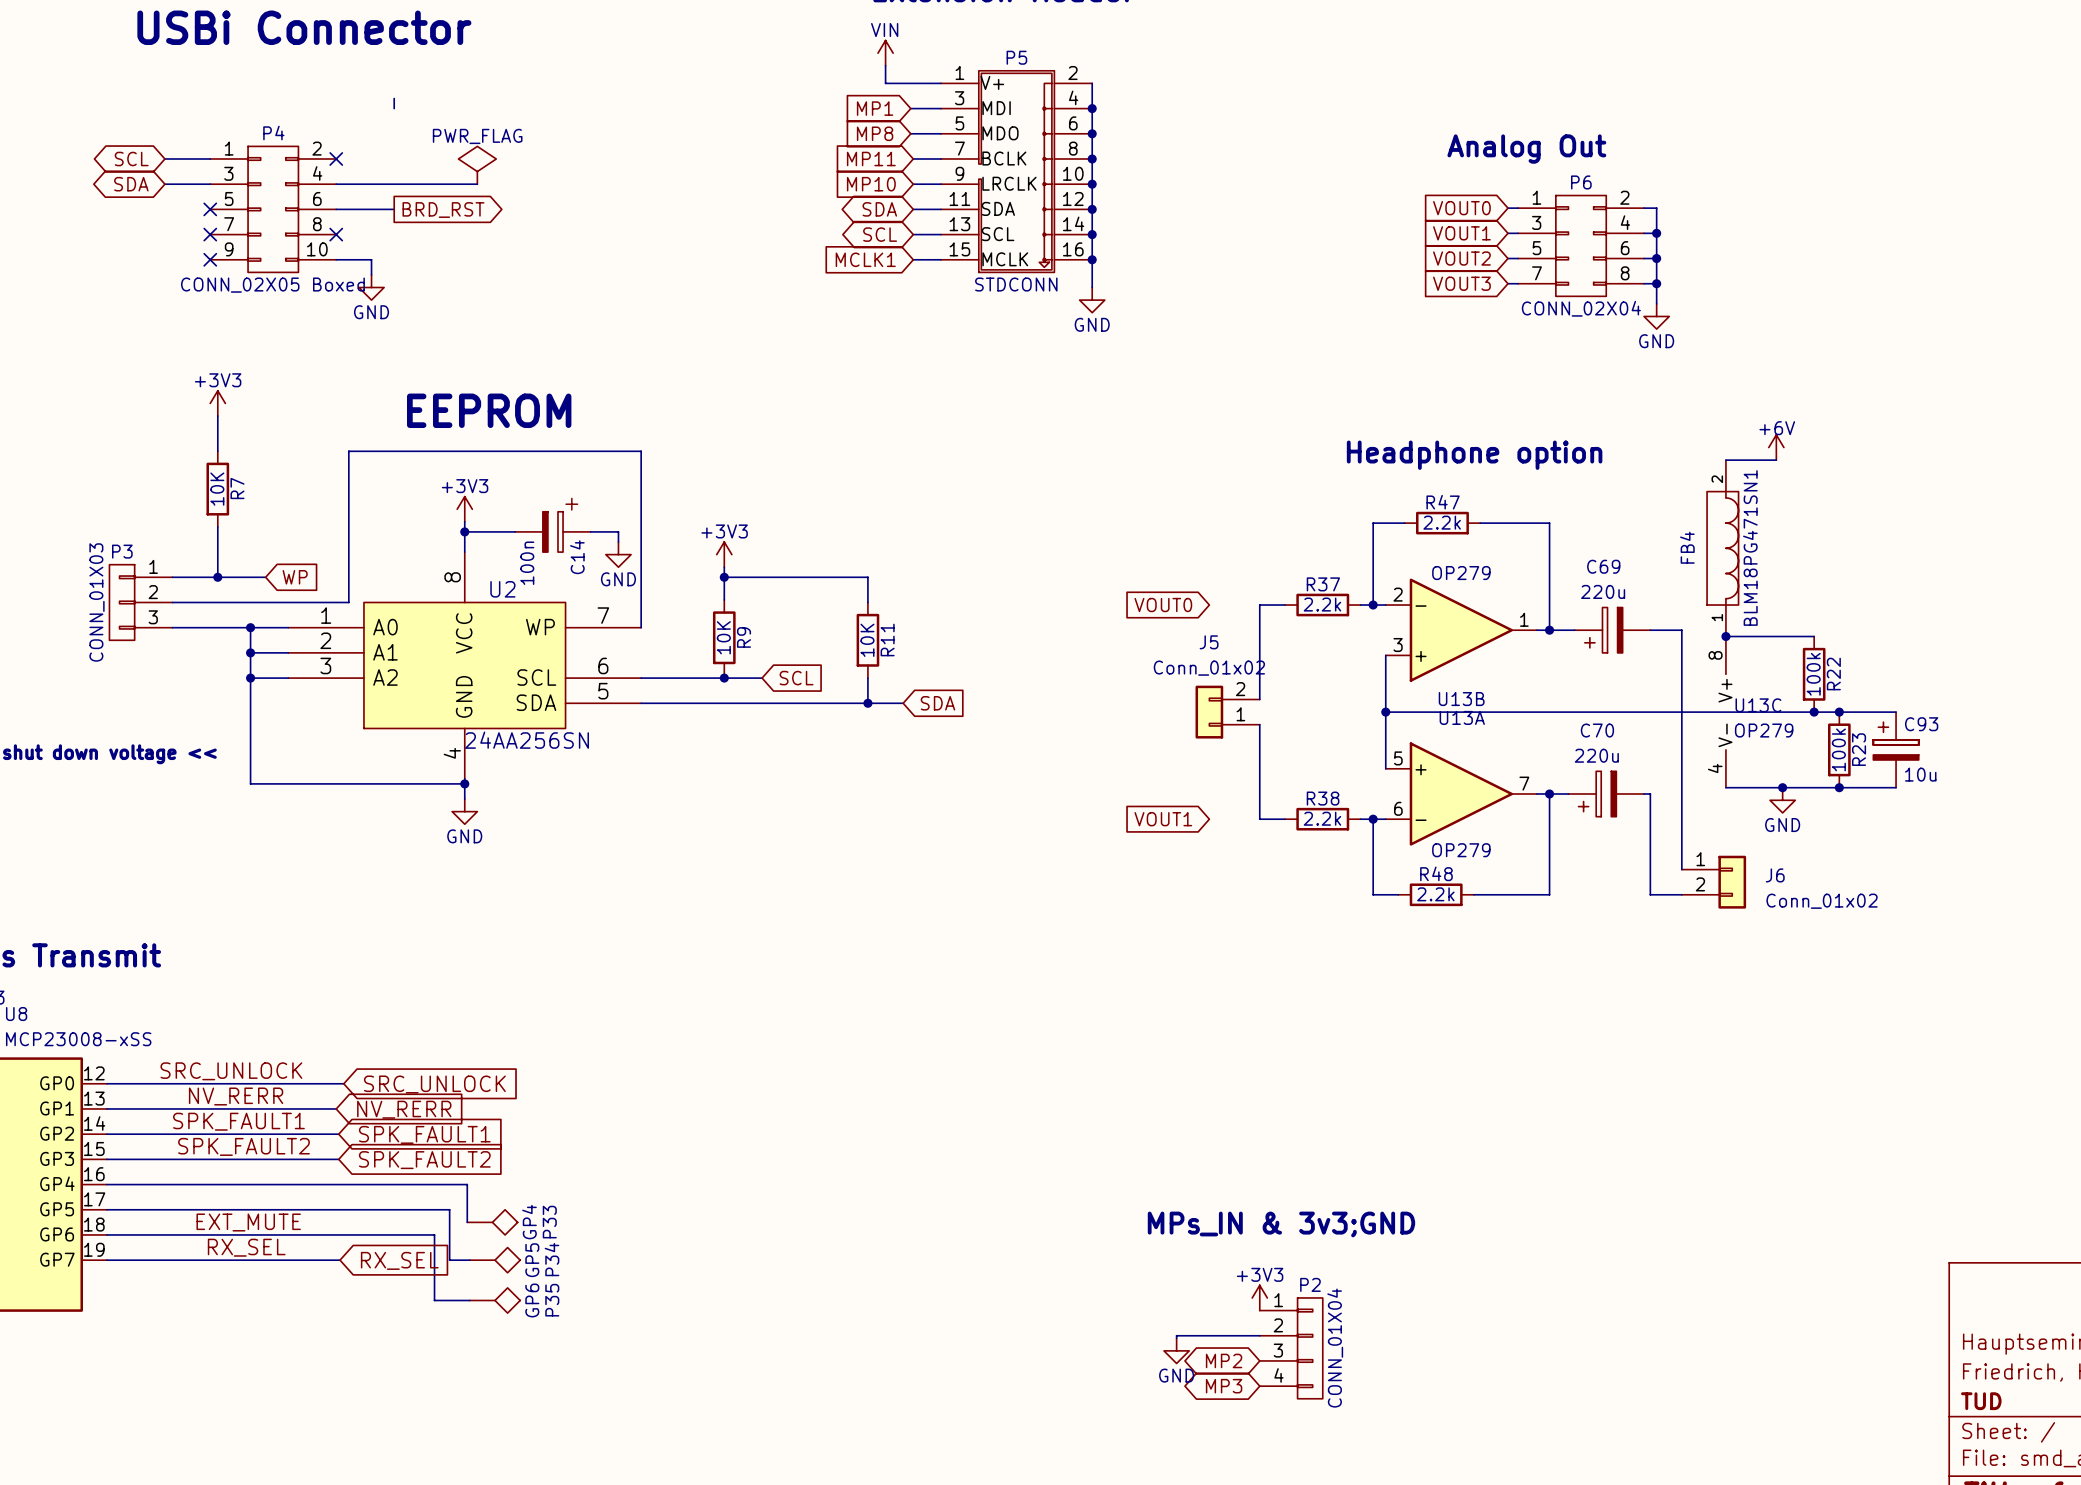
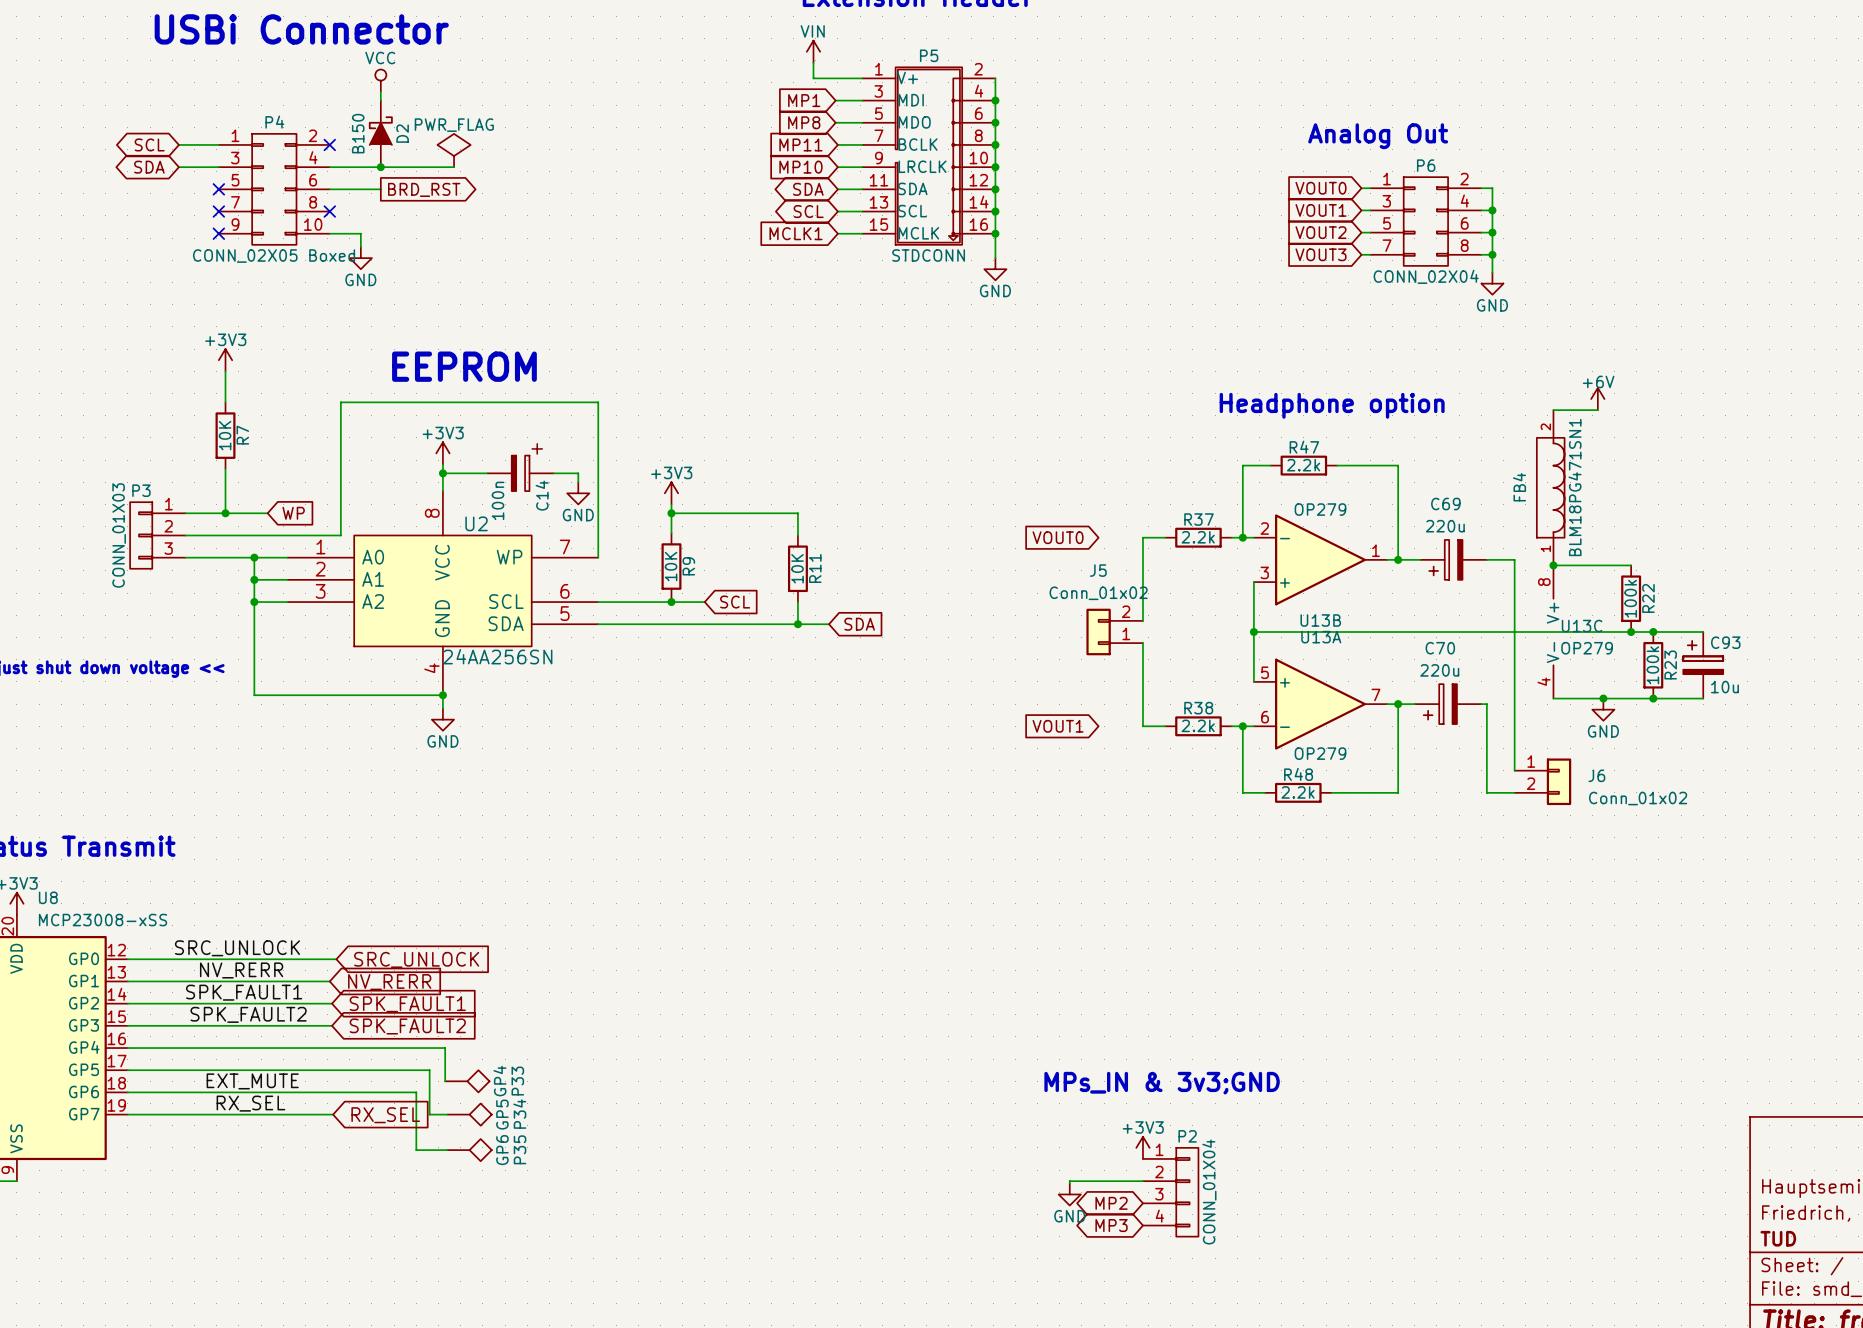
power symbol: none -> VCC (380, 80)
D2: none -> B150 (380, 133)
junction: none -> (380, 167)

